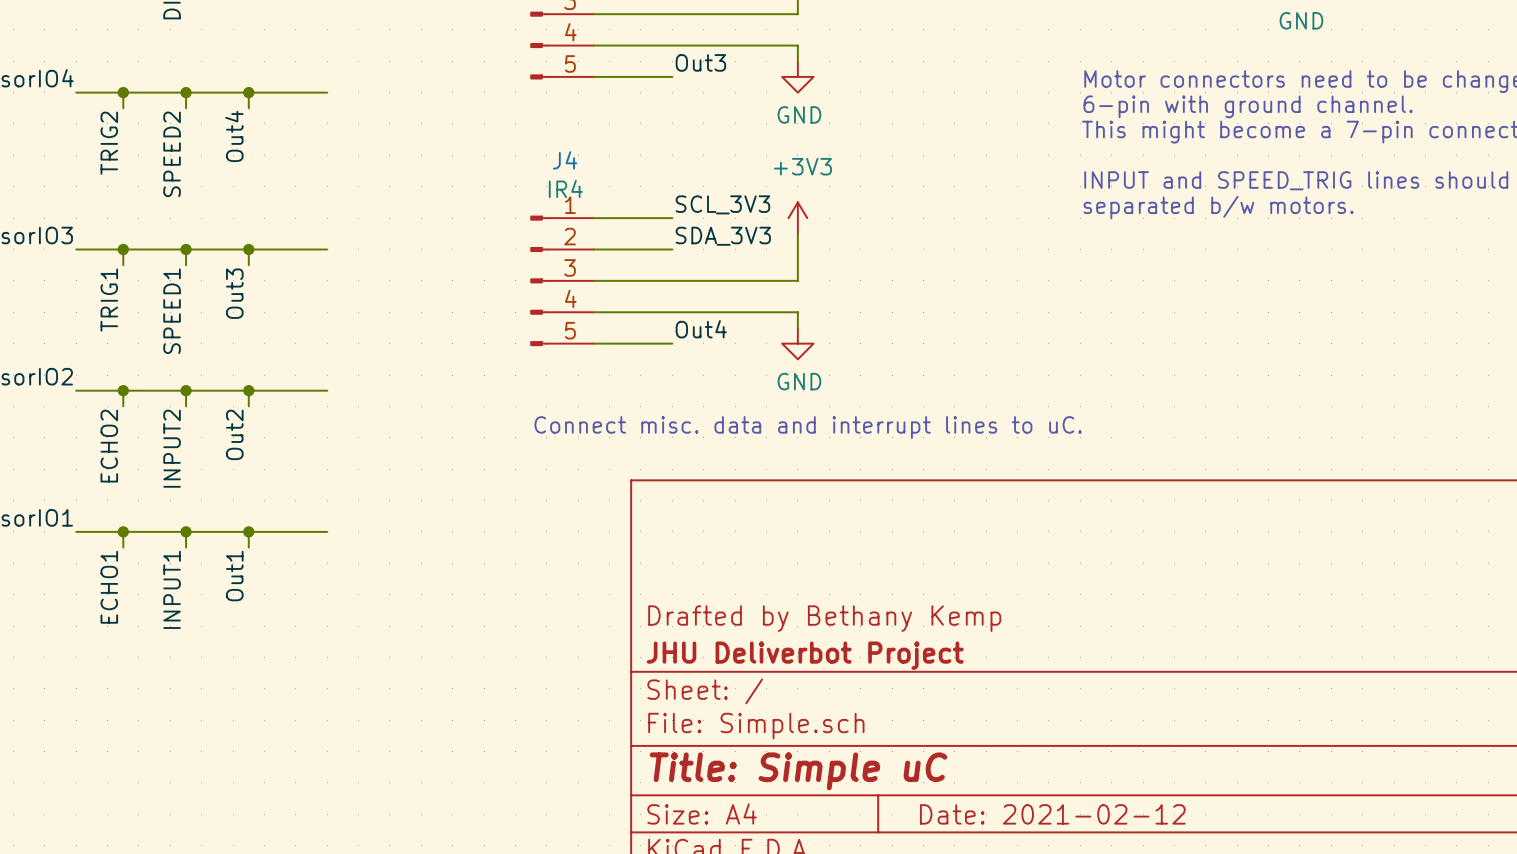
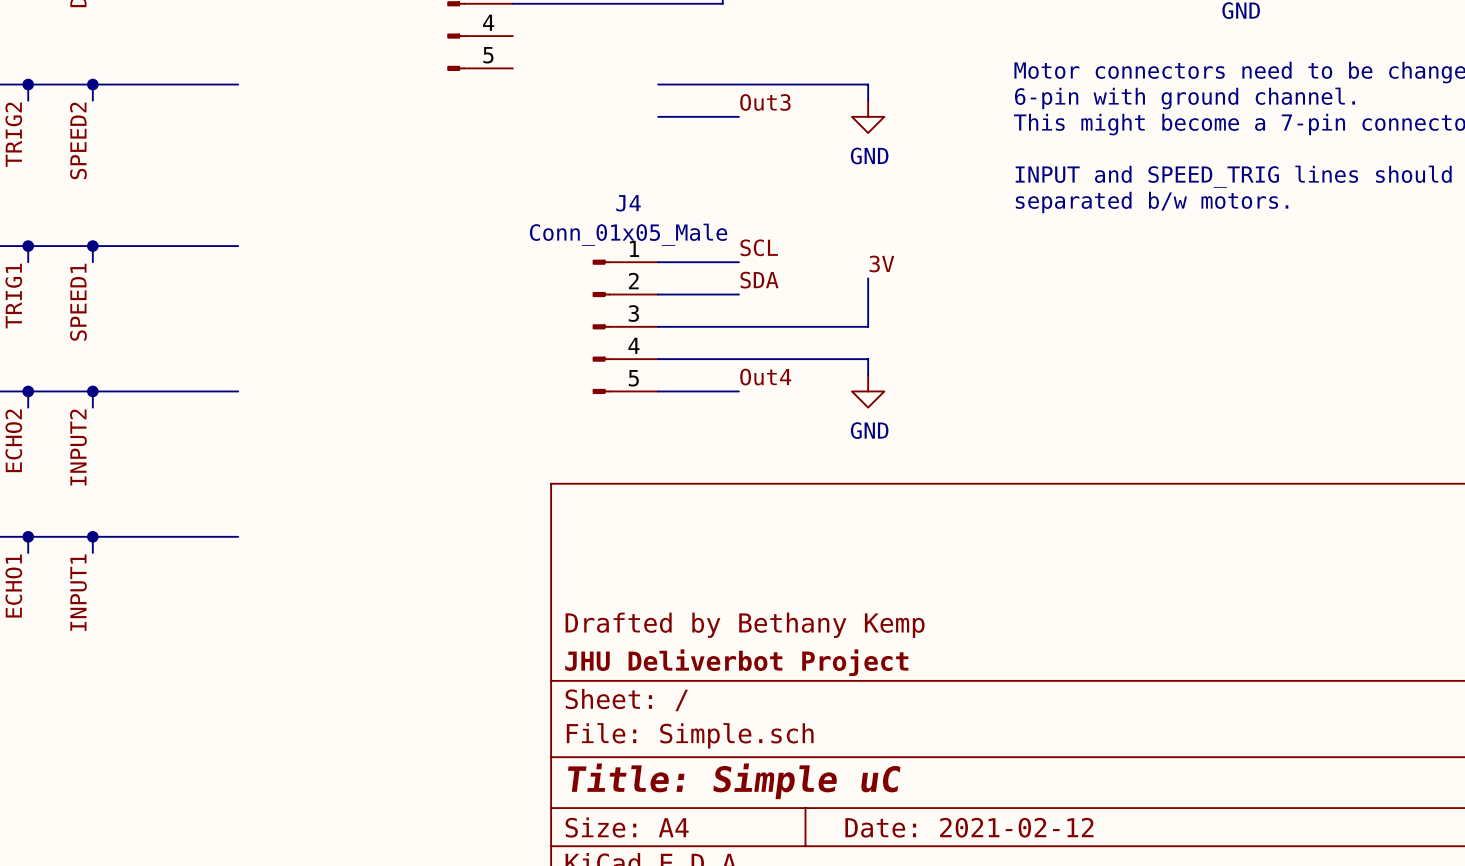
wire: (593, 45) (797, 45) (797, 61) -> (658, 84) (868, 84) (868, 100)
label position: Out3 (700, 62) -> Out3 (765, 102)
wire: (593, 76) (672, 76) -> (658, 116) (738, 116)
power symbol: GND (797, 76) -> none
wire: (248, 92) (248, 108) -> none
junction: (248, 92) -> none
power symbol: none -> GND (868, 116)
label: Out4 (234, 136) -> none
J4 value: IR4 (565, 188) -> Conn_01x05_Male (628, 234)
label: SCL_3V3 (722, 204) -> none
wire: (593, 218) (672, 218) -> (658, 262) (738, 262)
power symbol: +3V3 (797, 218) -> none
wire: (797, 233) (797, 280) (593, 280) -> (868, 278) (868, 326) (658, 326)
label: SDA_3V3 (723, 236) -> none
wire: (248, 249) (248, 265) -> none
junction: (248, 249) -> none
wire: (593, 249) (672, 249) -> (658, 294) (738, 294)
label: none -> SCL (759, 247)
label: none -> 3V (881, 263)
J4 position: (562, 280) -> (625, 326)
label: none -> SDA (759, 280)
label: Out3 (234, 293) -> none
wire: (593, 312) (797, 312) (797, 327) -> (658, 359) (868, 359) (868, 375)
label position: Out4 (701, 329) -> Out4 (765, 377)
wire: (593, 343) (672, 343) -> (658, 391) (738, 391)
power symbol: GND (797, 343) -> none
wire: (248, 390) (248, 406) -> none
junction: (248, 390) -> none
power symbol: none -> GND (868, 391)
text: Connect misc. data and interrupt lines to uC. (808, 427) -> none
label: Out2 (234, 434) -> none
wire: (248, 531) (248, 547) -> none
junction: (248, 531) -> none
label: Out1 (234, 576) -> none

